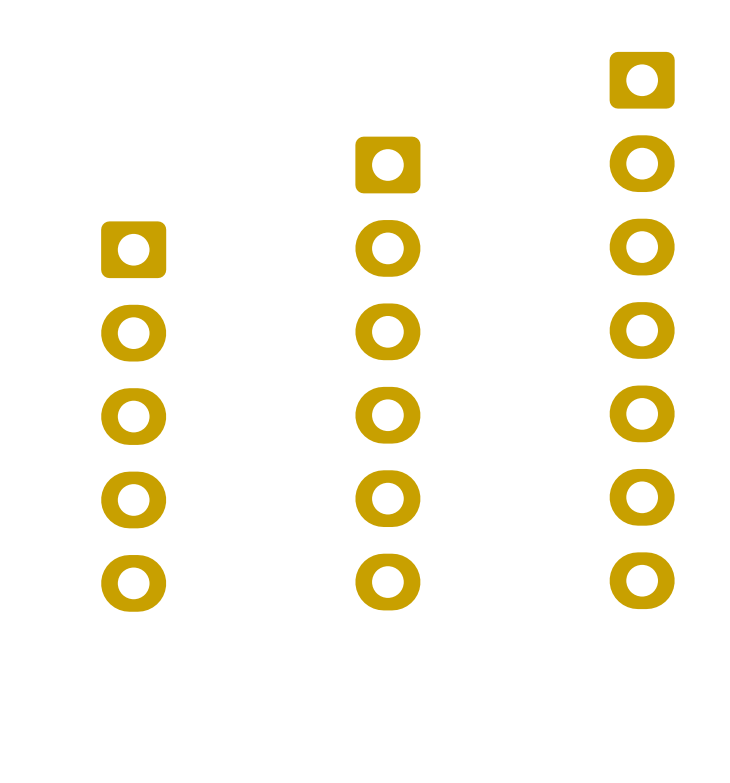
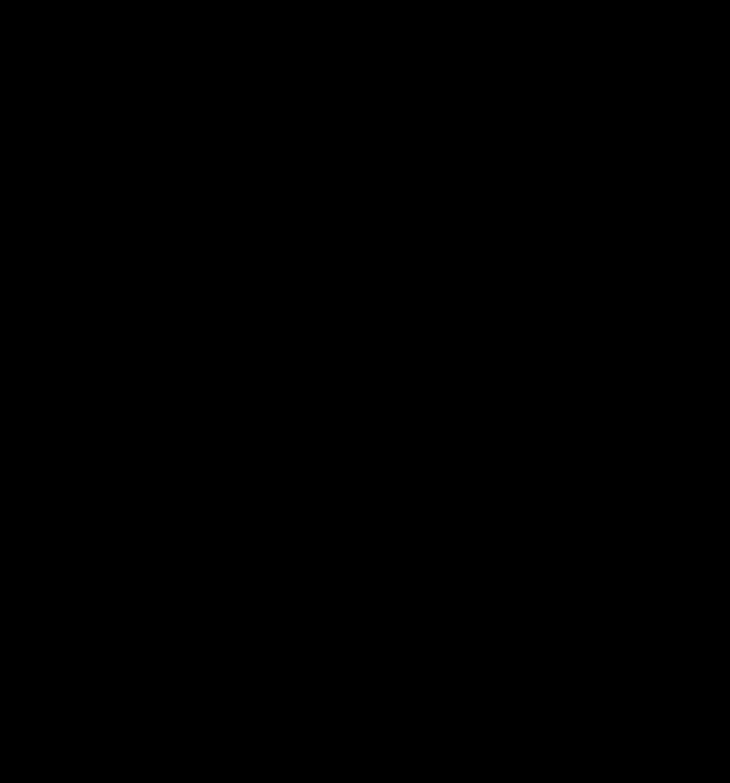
part: (642, 330) -> none
part: (387, 373) -> none
part: (133, 416) -> none

